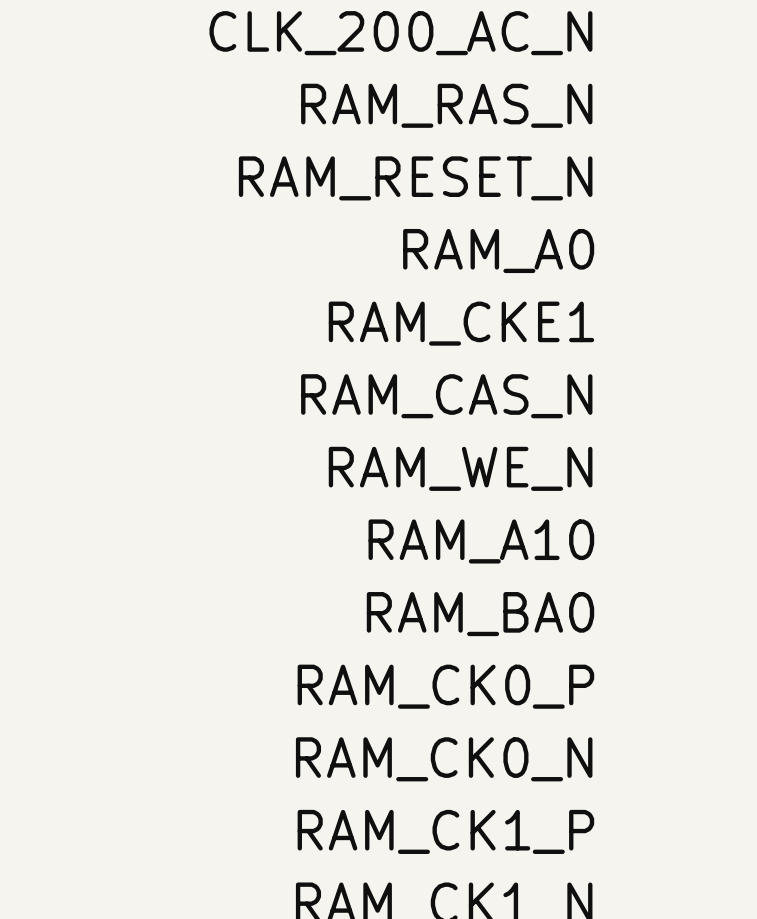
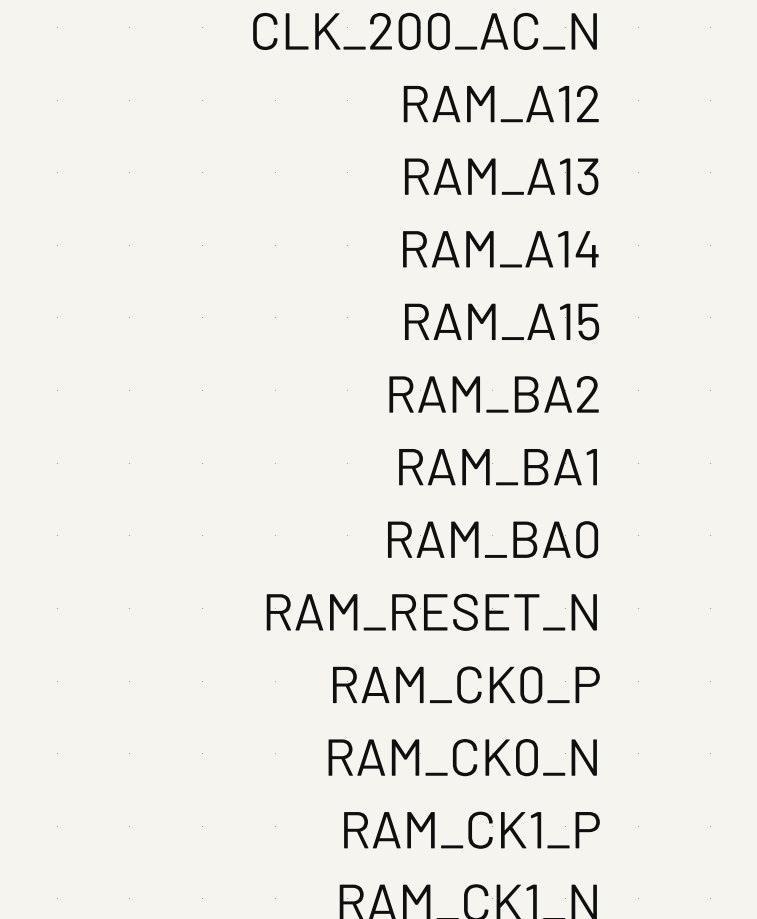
label: RAM_RAS_N (446, 105) -> RAM_A12 (501, 103)
label: RAM_RESET_N (415, 178) -> RAM_A13 (501, 176)
label: RAM_A0 (498, 251) -> RAM_A14 (500, 249)
label: RAM_CKE1 (461, 323) -> RAM_A15 (502, 322)
label: RAM_CAS_N (446, 396) -> RAM_BA2 (494, 394)
label: RAM_WE_N (460, 468) -> RAM_BA1 (498, 467)
label: RAM_A10 (481, 541) -> RAM_BA0 (493, 539)
label: RAM_BA0 (480, 614) -> RAM_RESET_N (431, 612)

